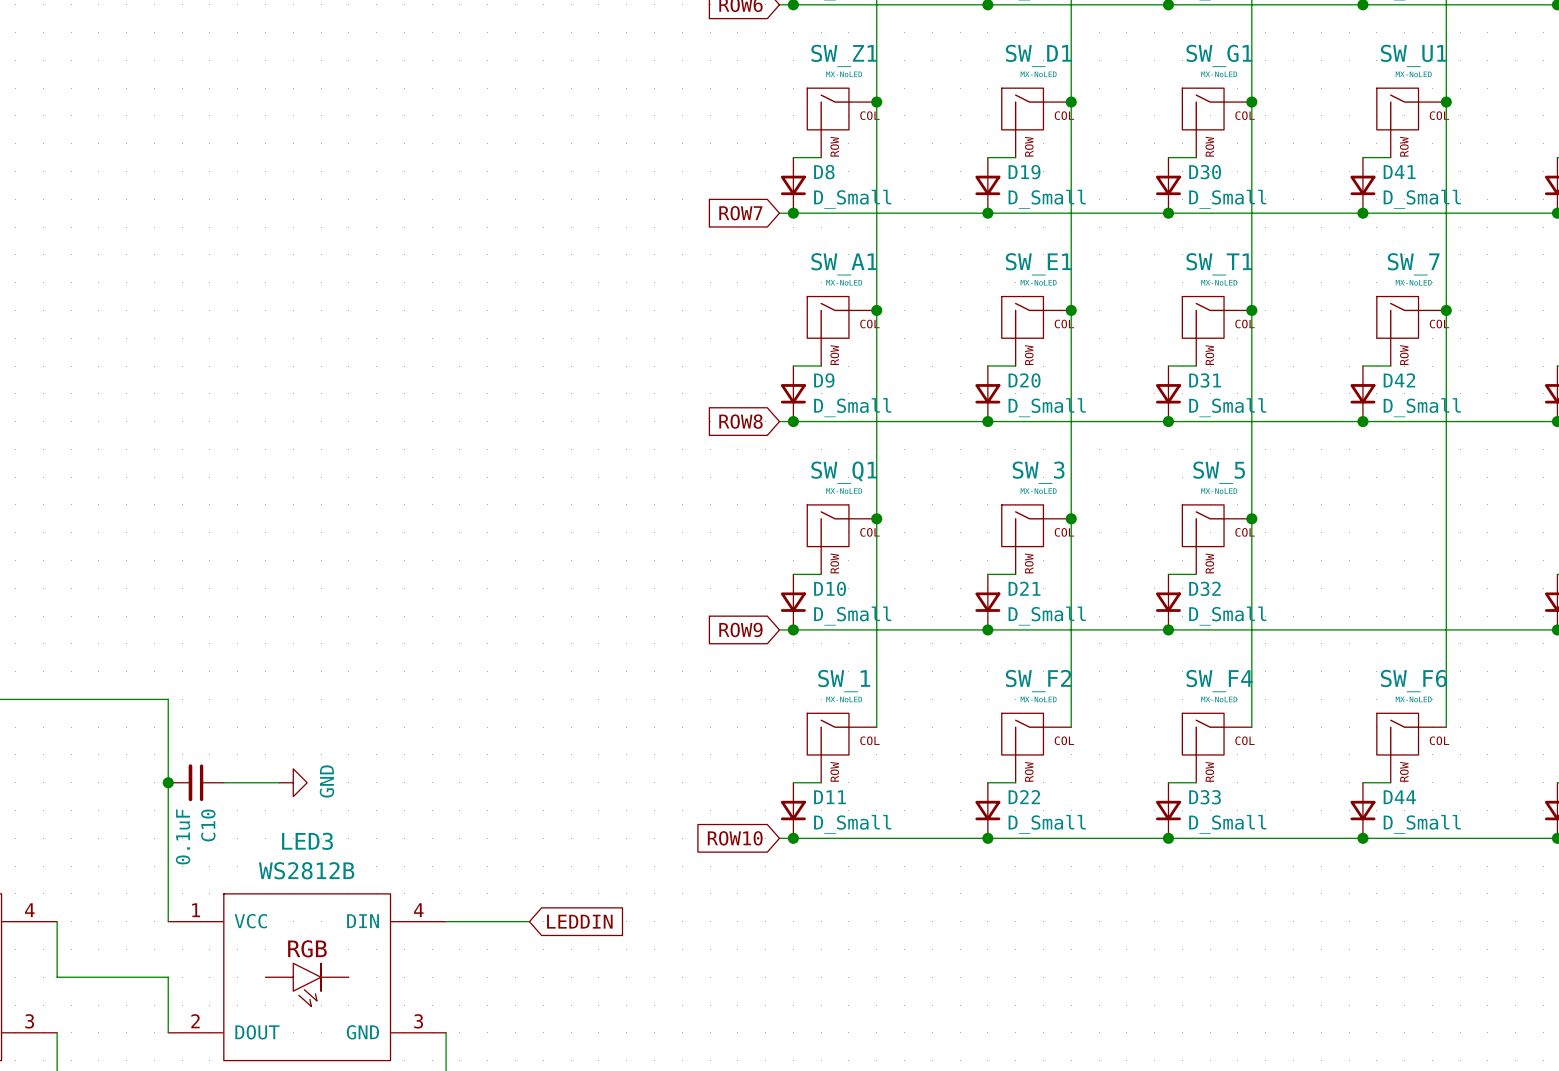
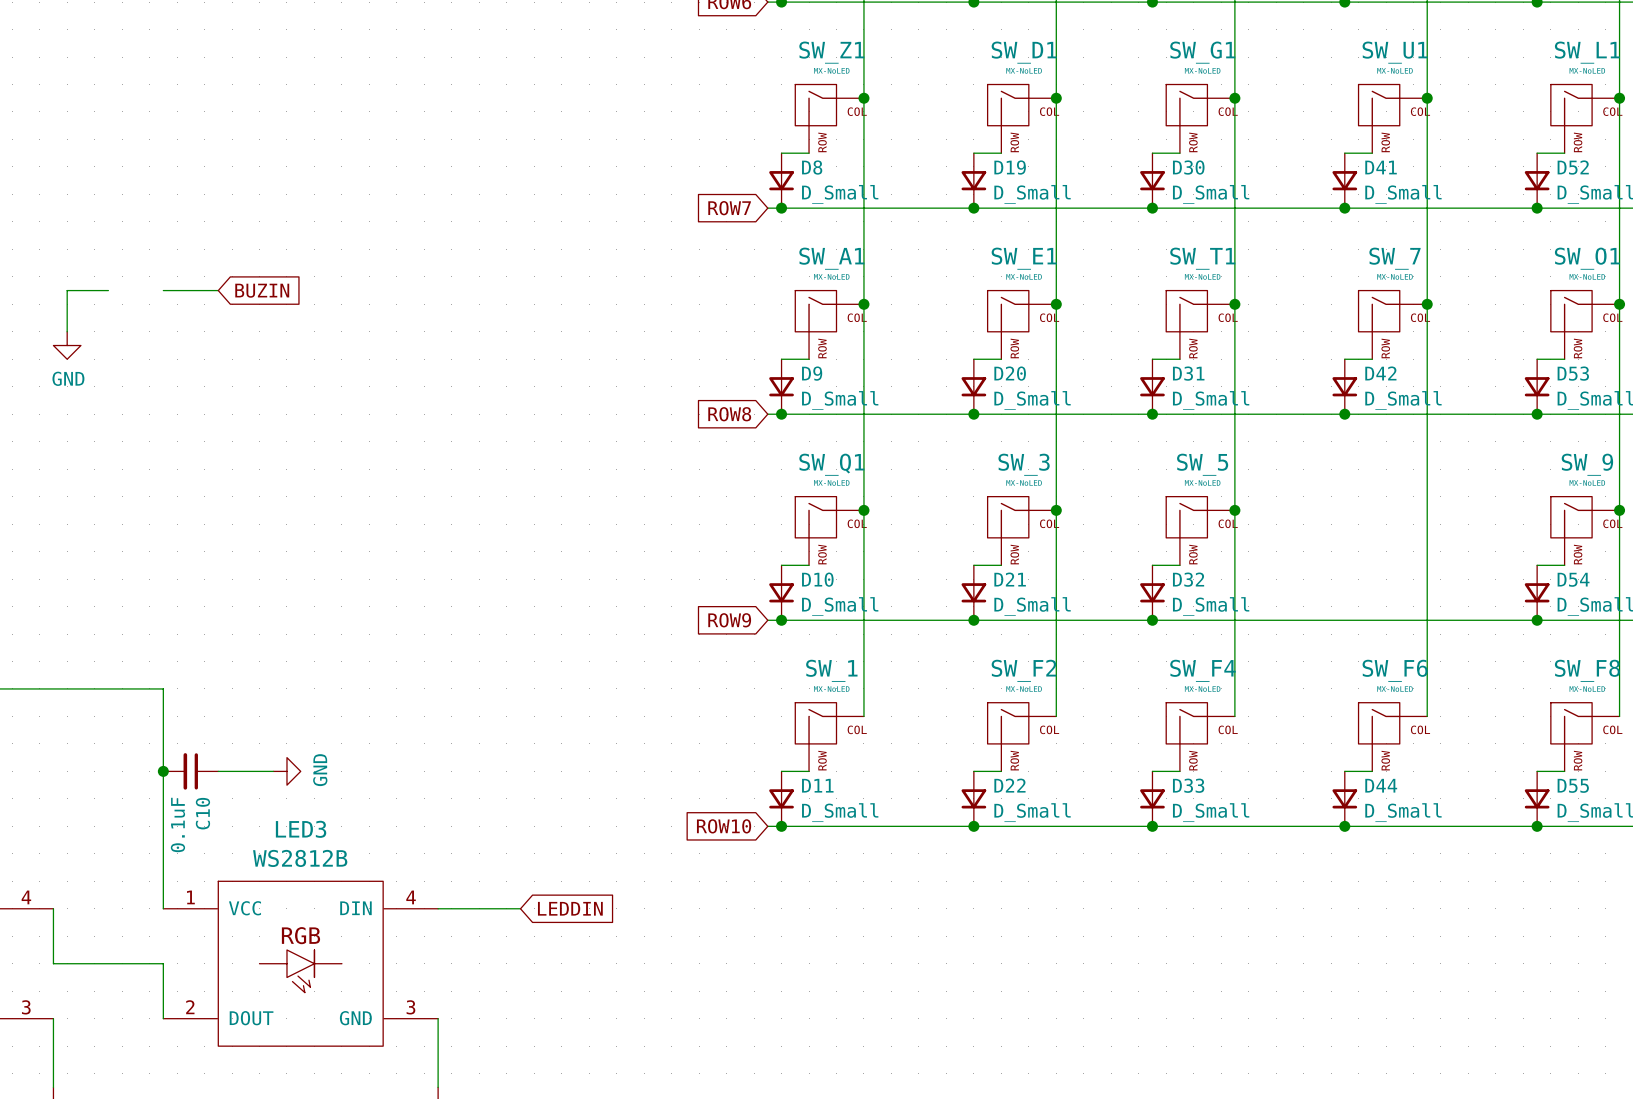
wire: none -> (108, 290) (67, 290) (67, 331)
wire: none -> (163, 290) (218, 290)
global label: none -> BUZIN (262, 290)
power symbol: none -> GND (67, 345)

